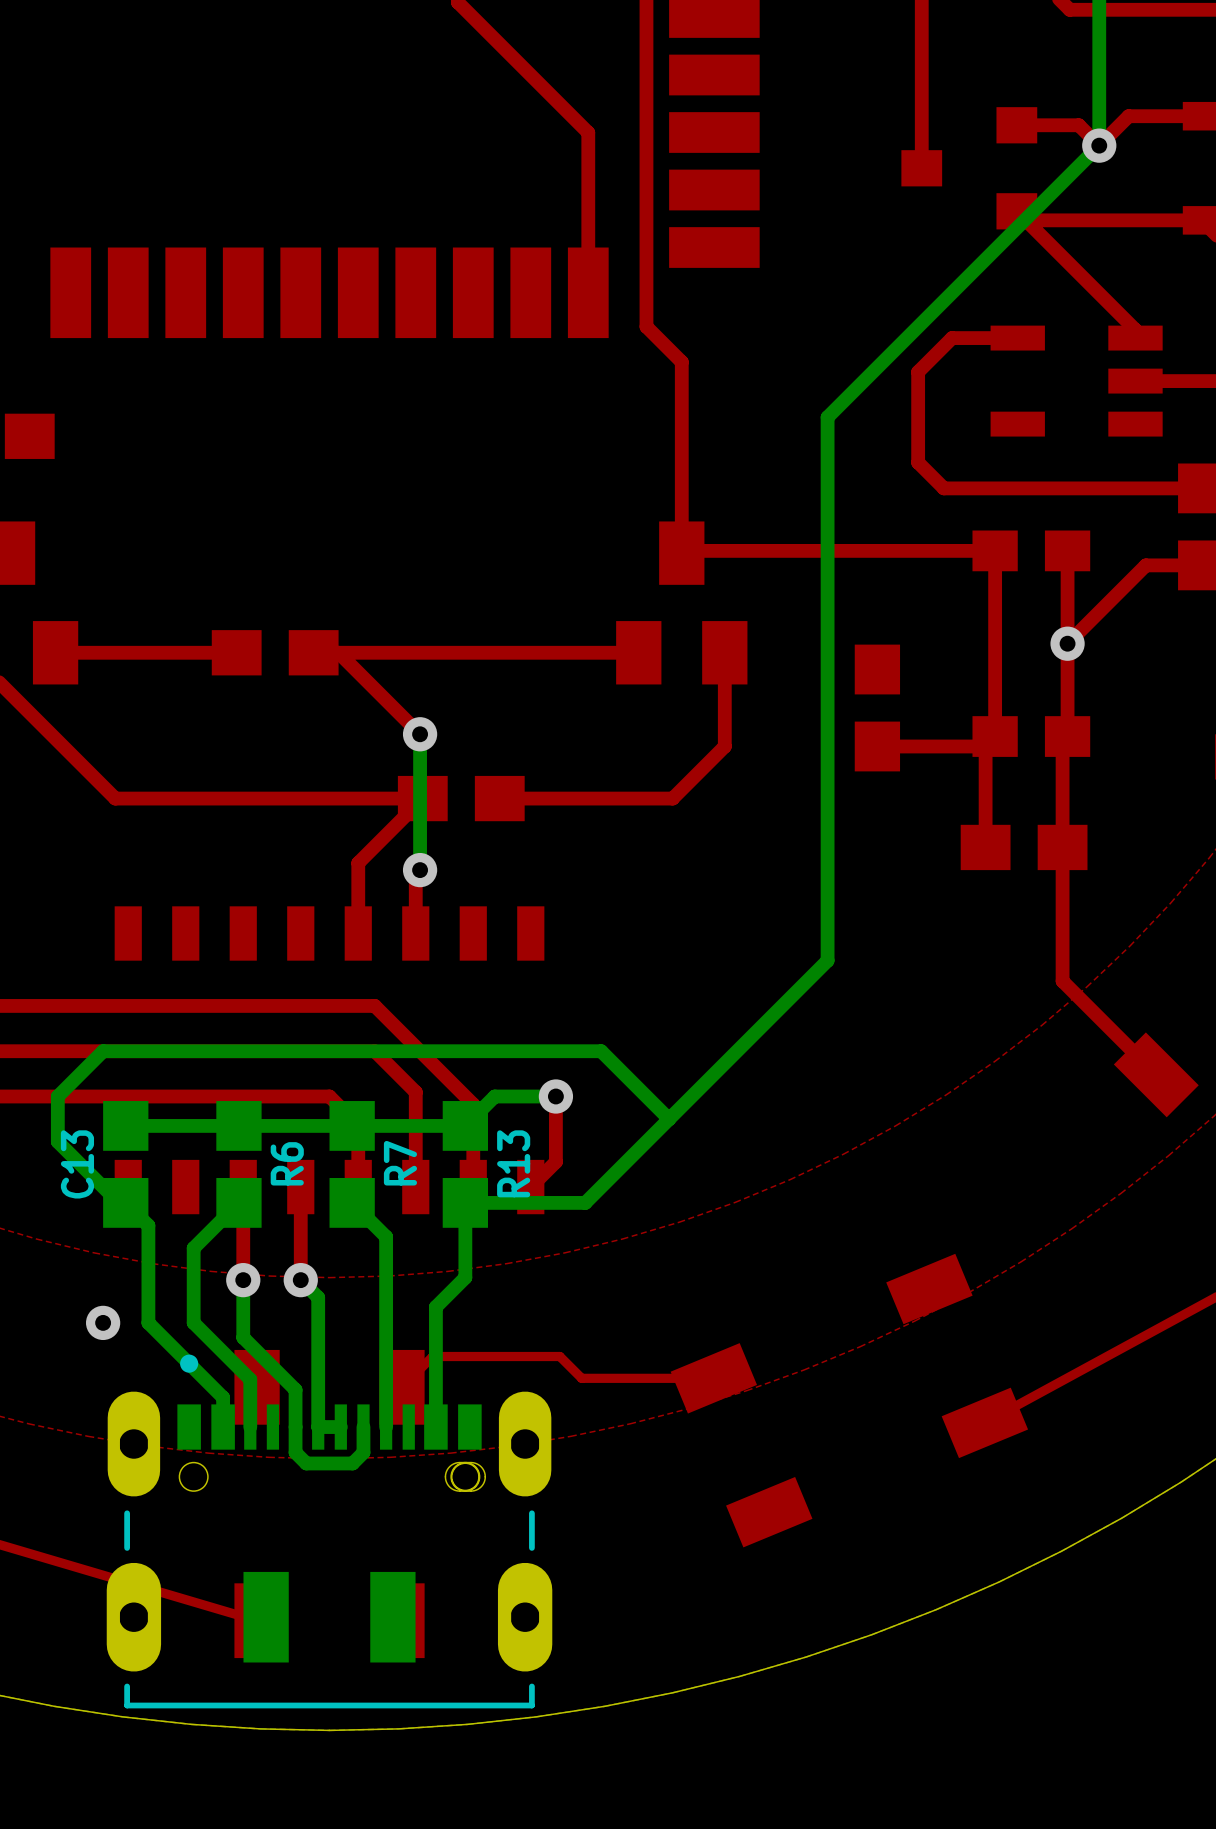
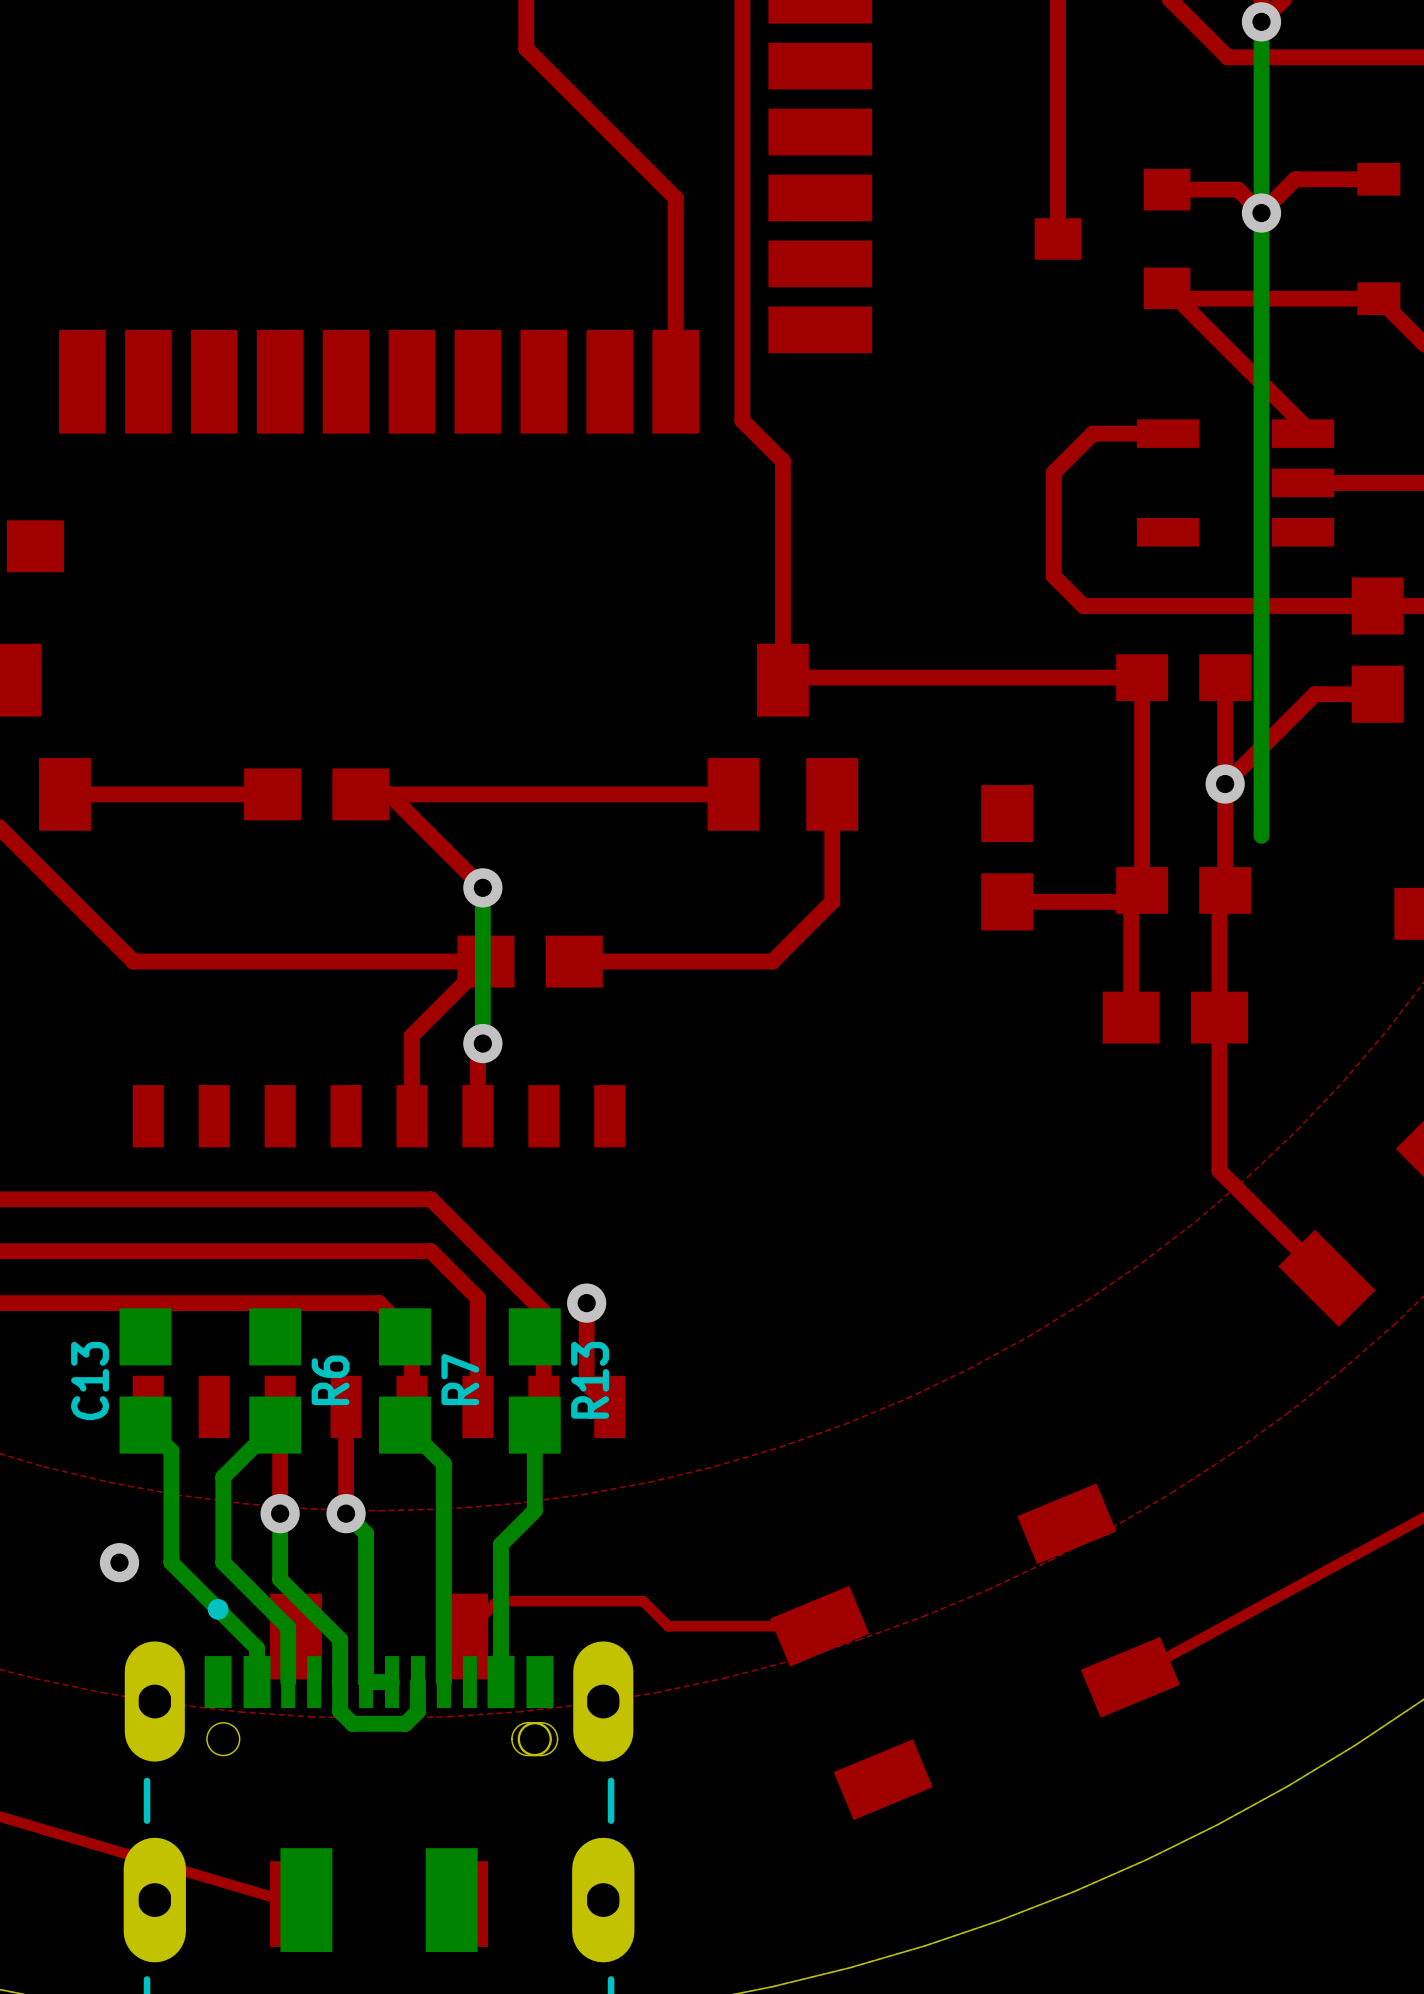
bottom track: (1099, 145) (827, 417) (827, 960) (585, 1202) (465, 1202) -> (1261, 213) (1261, 835)
top track: (555, 1096) (555, 1161) (530, 1187) -> (586, 1303) (586, 1383) (609, 1406)
bottom track: (555, 1096) (494, 1096) (465, 1125) (125, 1125) -> none
via position: (555, 1096) -> (586, 1303)
bottom track: (669, 1119) (601, 1051) (103, 1051) (57, 1096) (57, 1141) (118, 1202) (125, 1202) -> none

